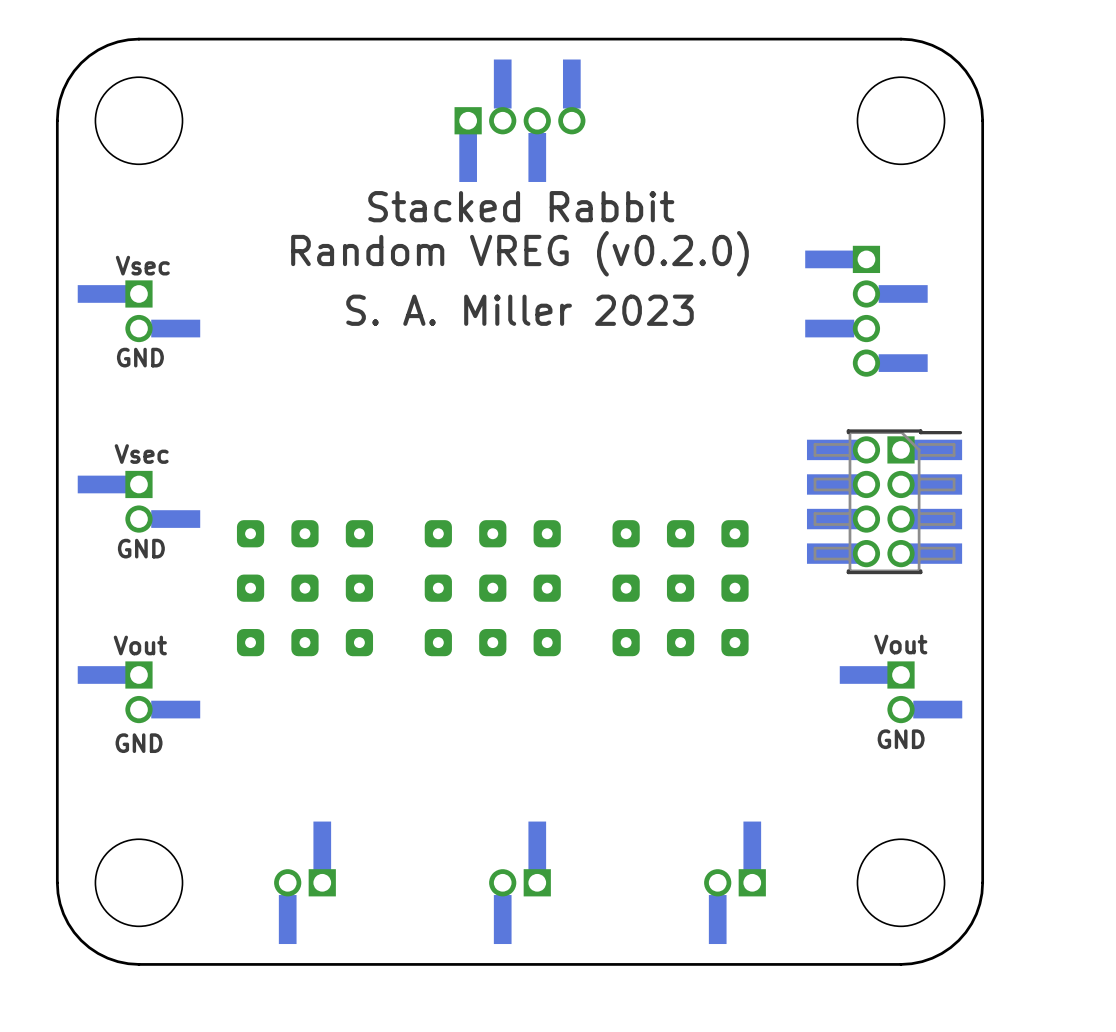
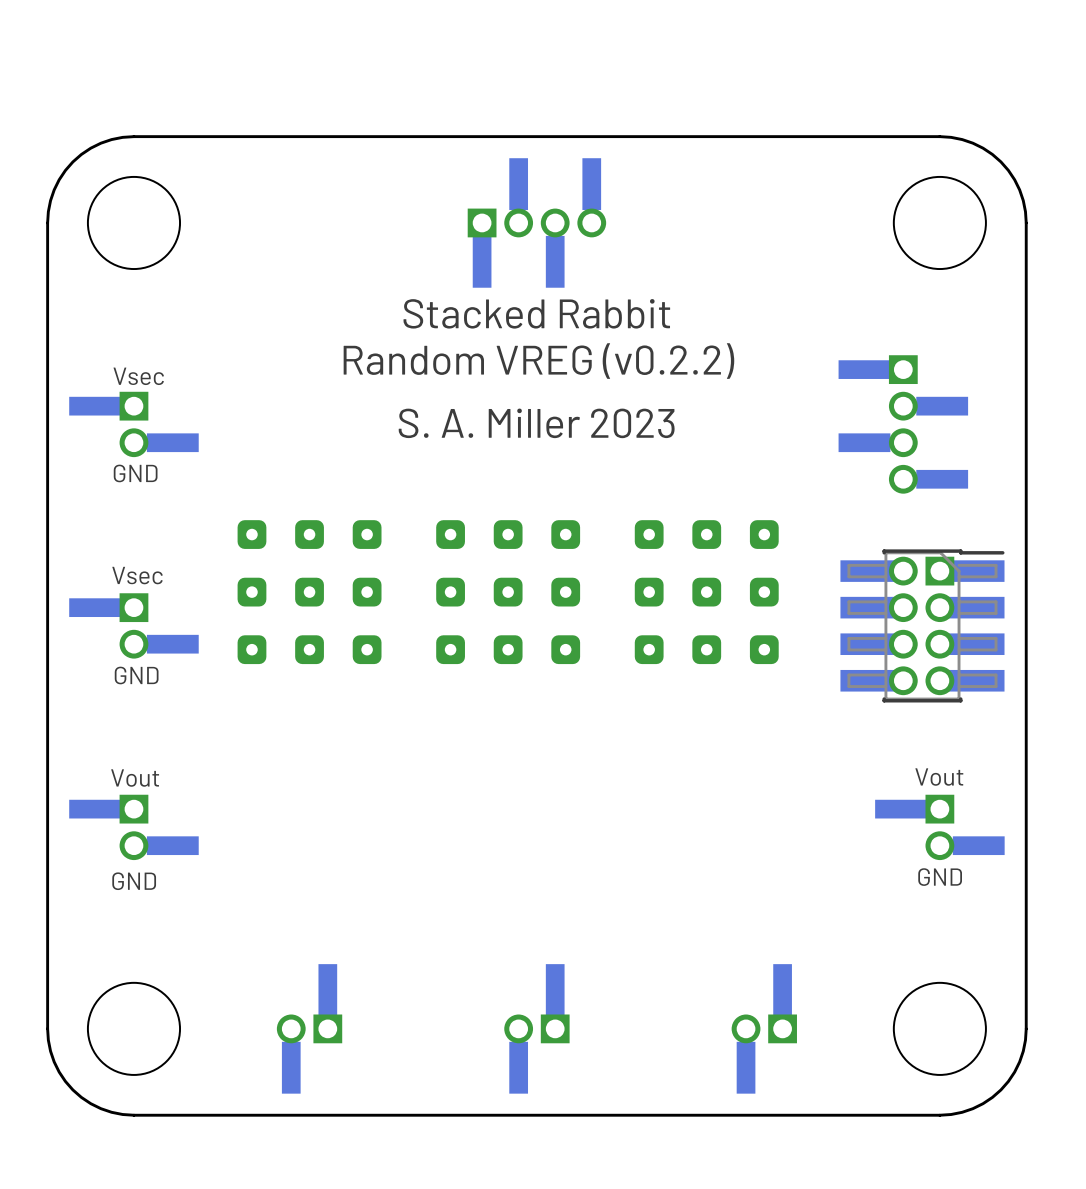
text: Random VREG (v0.2.0) (519, 253) -> Random VREG (v0.2.2) (538, 361)
part: none -> (309, 592)
part: none -> (508, 592)
part: none -> (706, 592)
part: (304, 588) -> none
part: (492, 588) -> none
part: (680, 588) -> none

